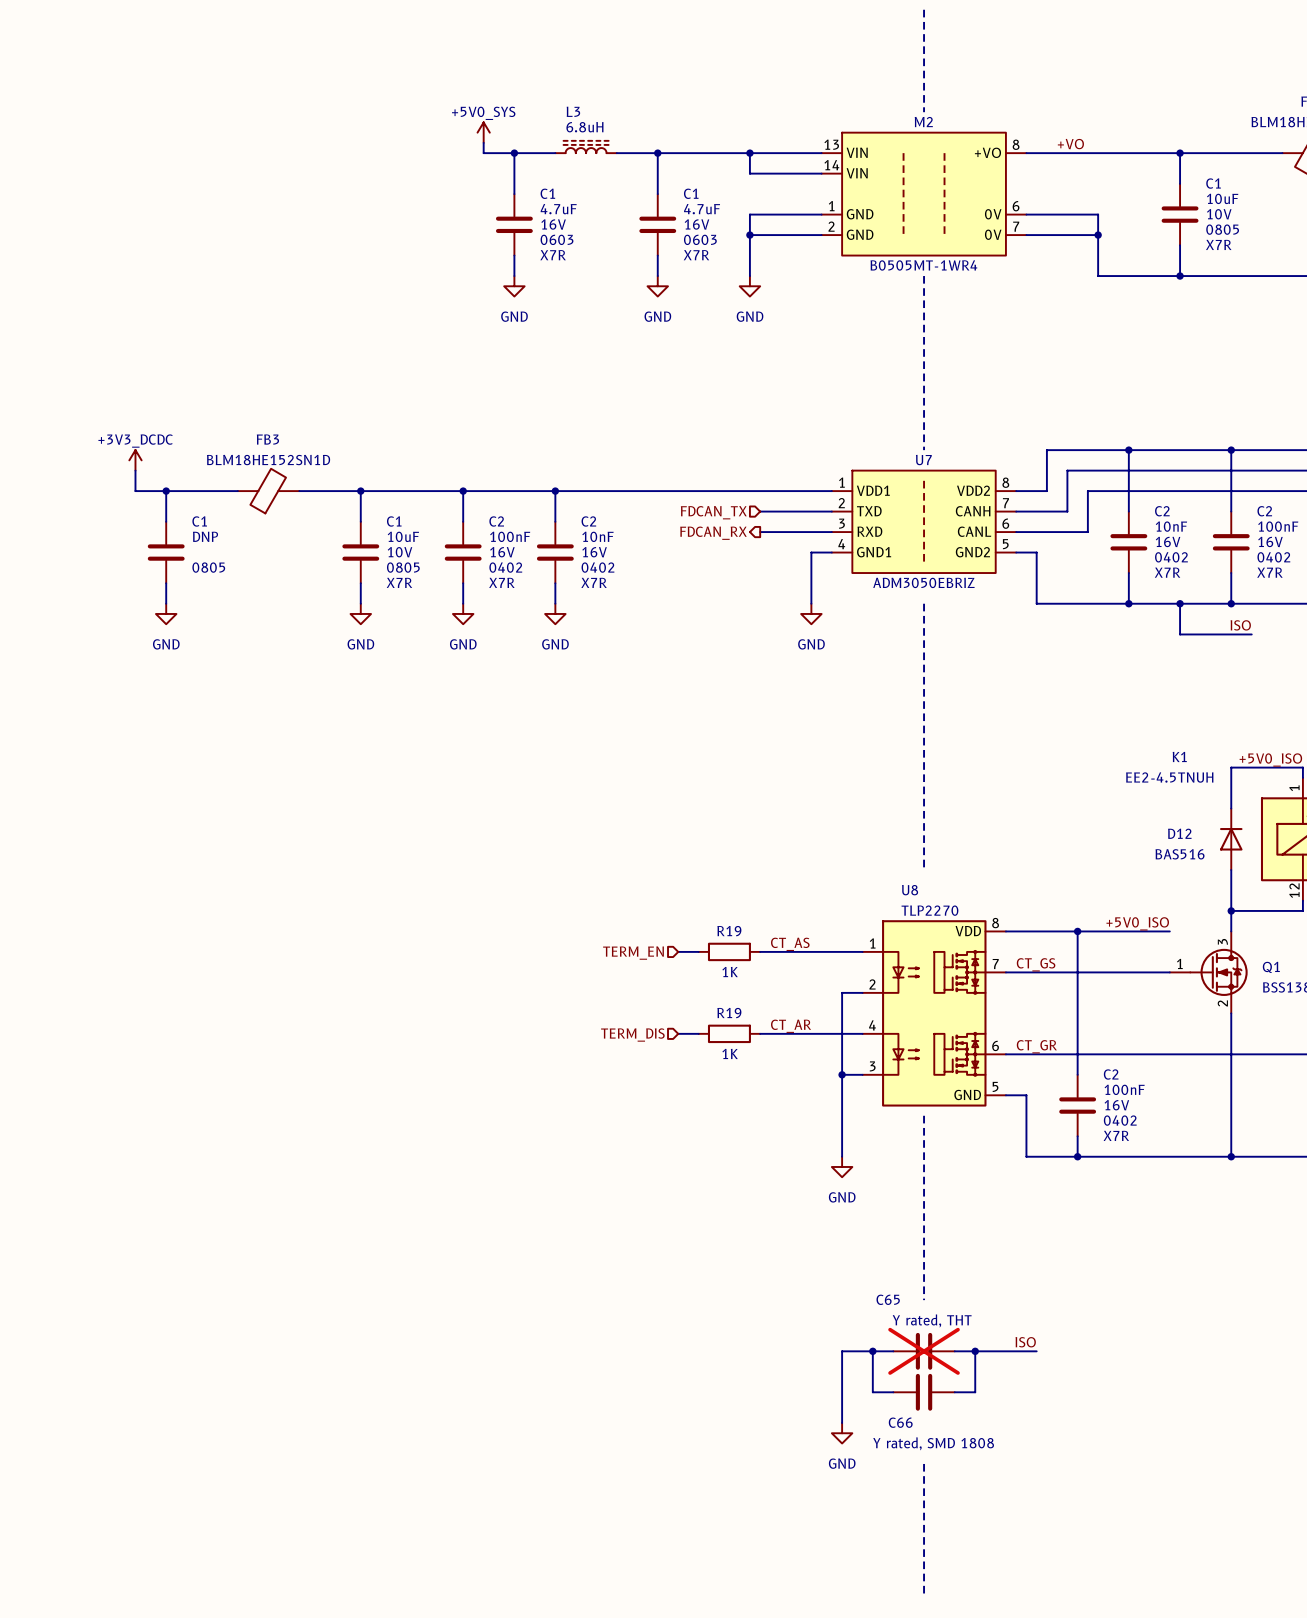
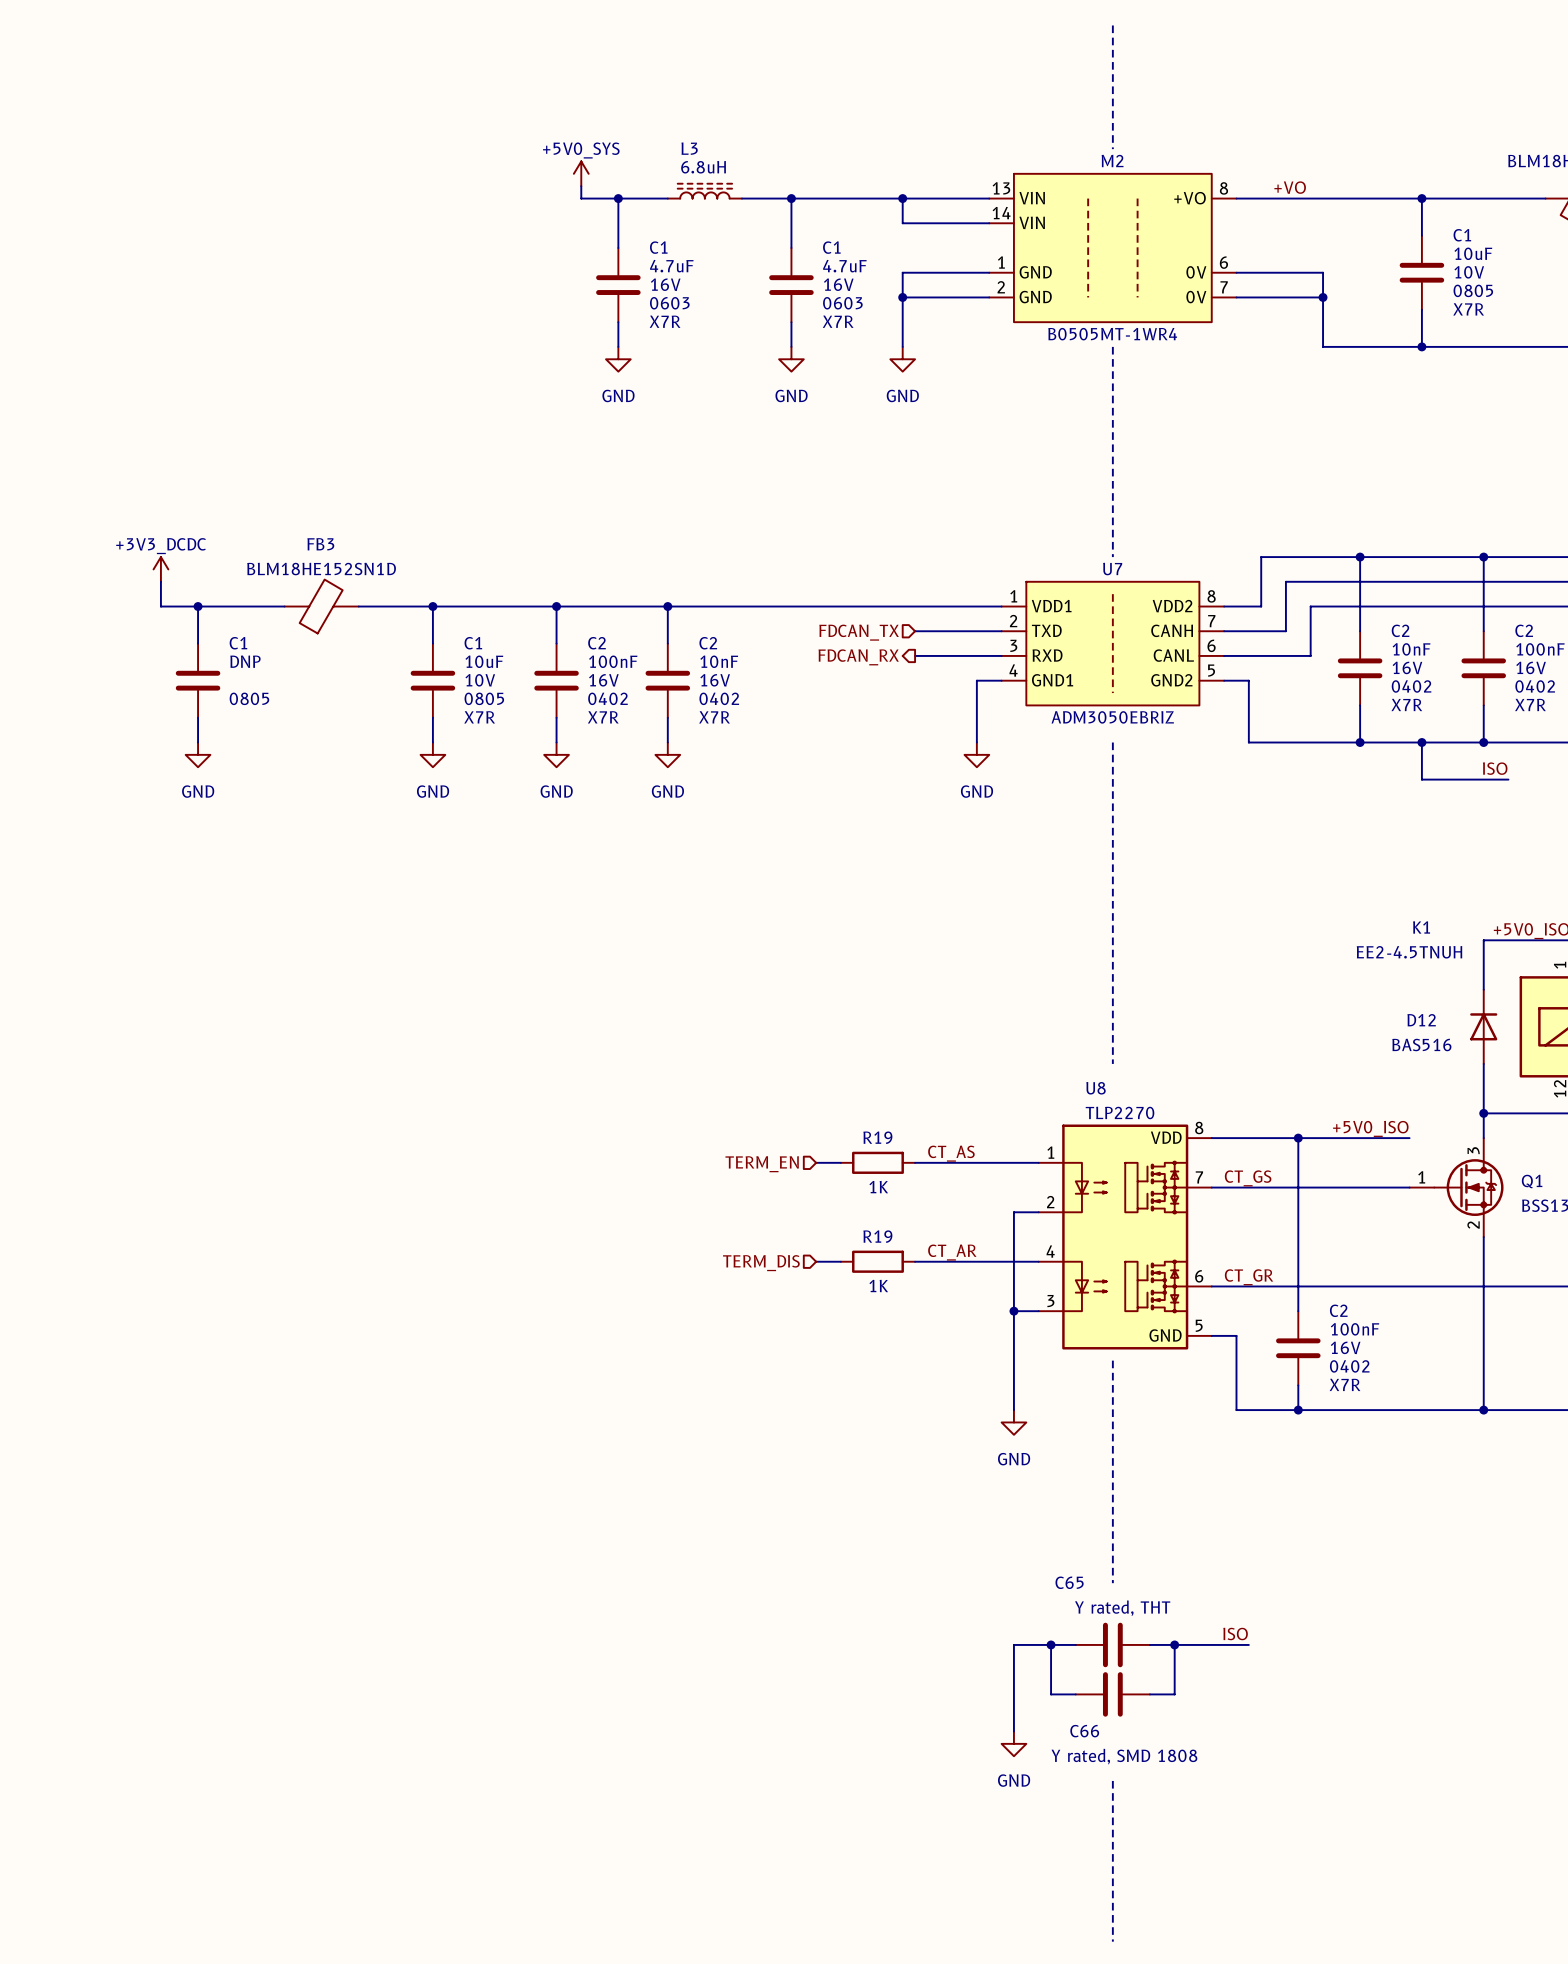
C65 do-not-place cross: (924, 1351) -> none

